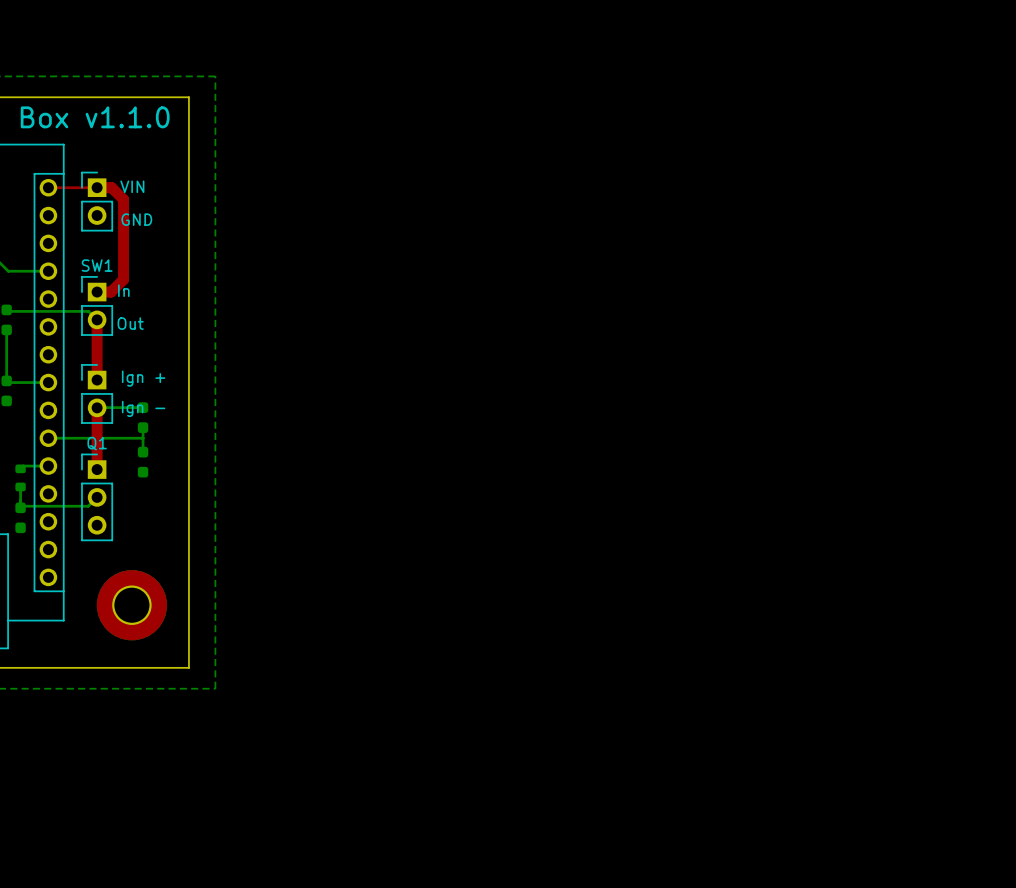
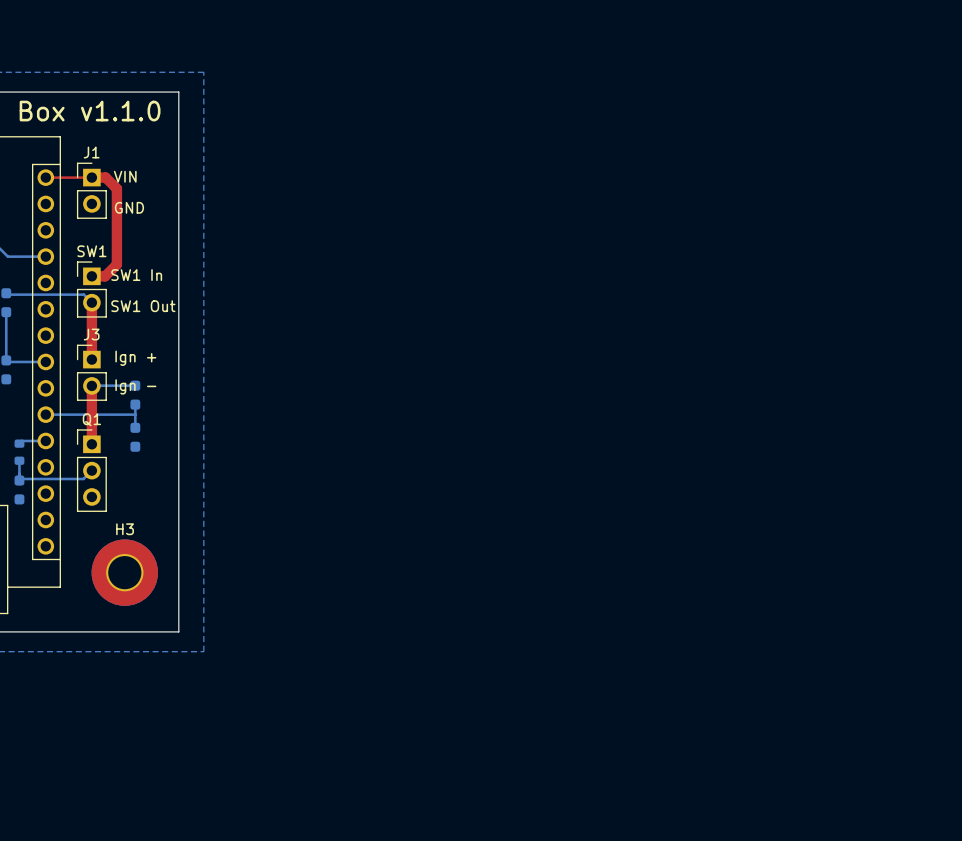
J1 name: none -> J1 (91, 152)
text: In (123, 290) -> SW1 In (136, 275)
text: Out (130, 323) -> SW1 Out (143, 306)
J3 name: none -> J3 (91, 334)
H3 name: none -> H3 (125, 529)

